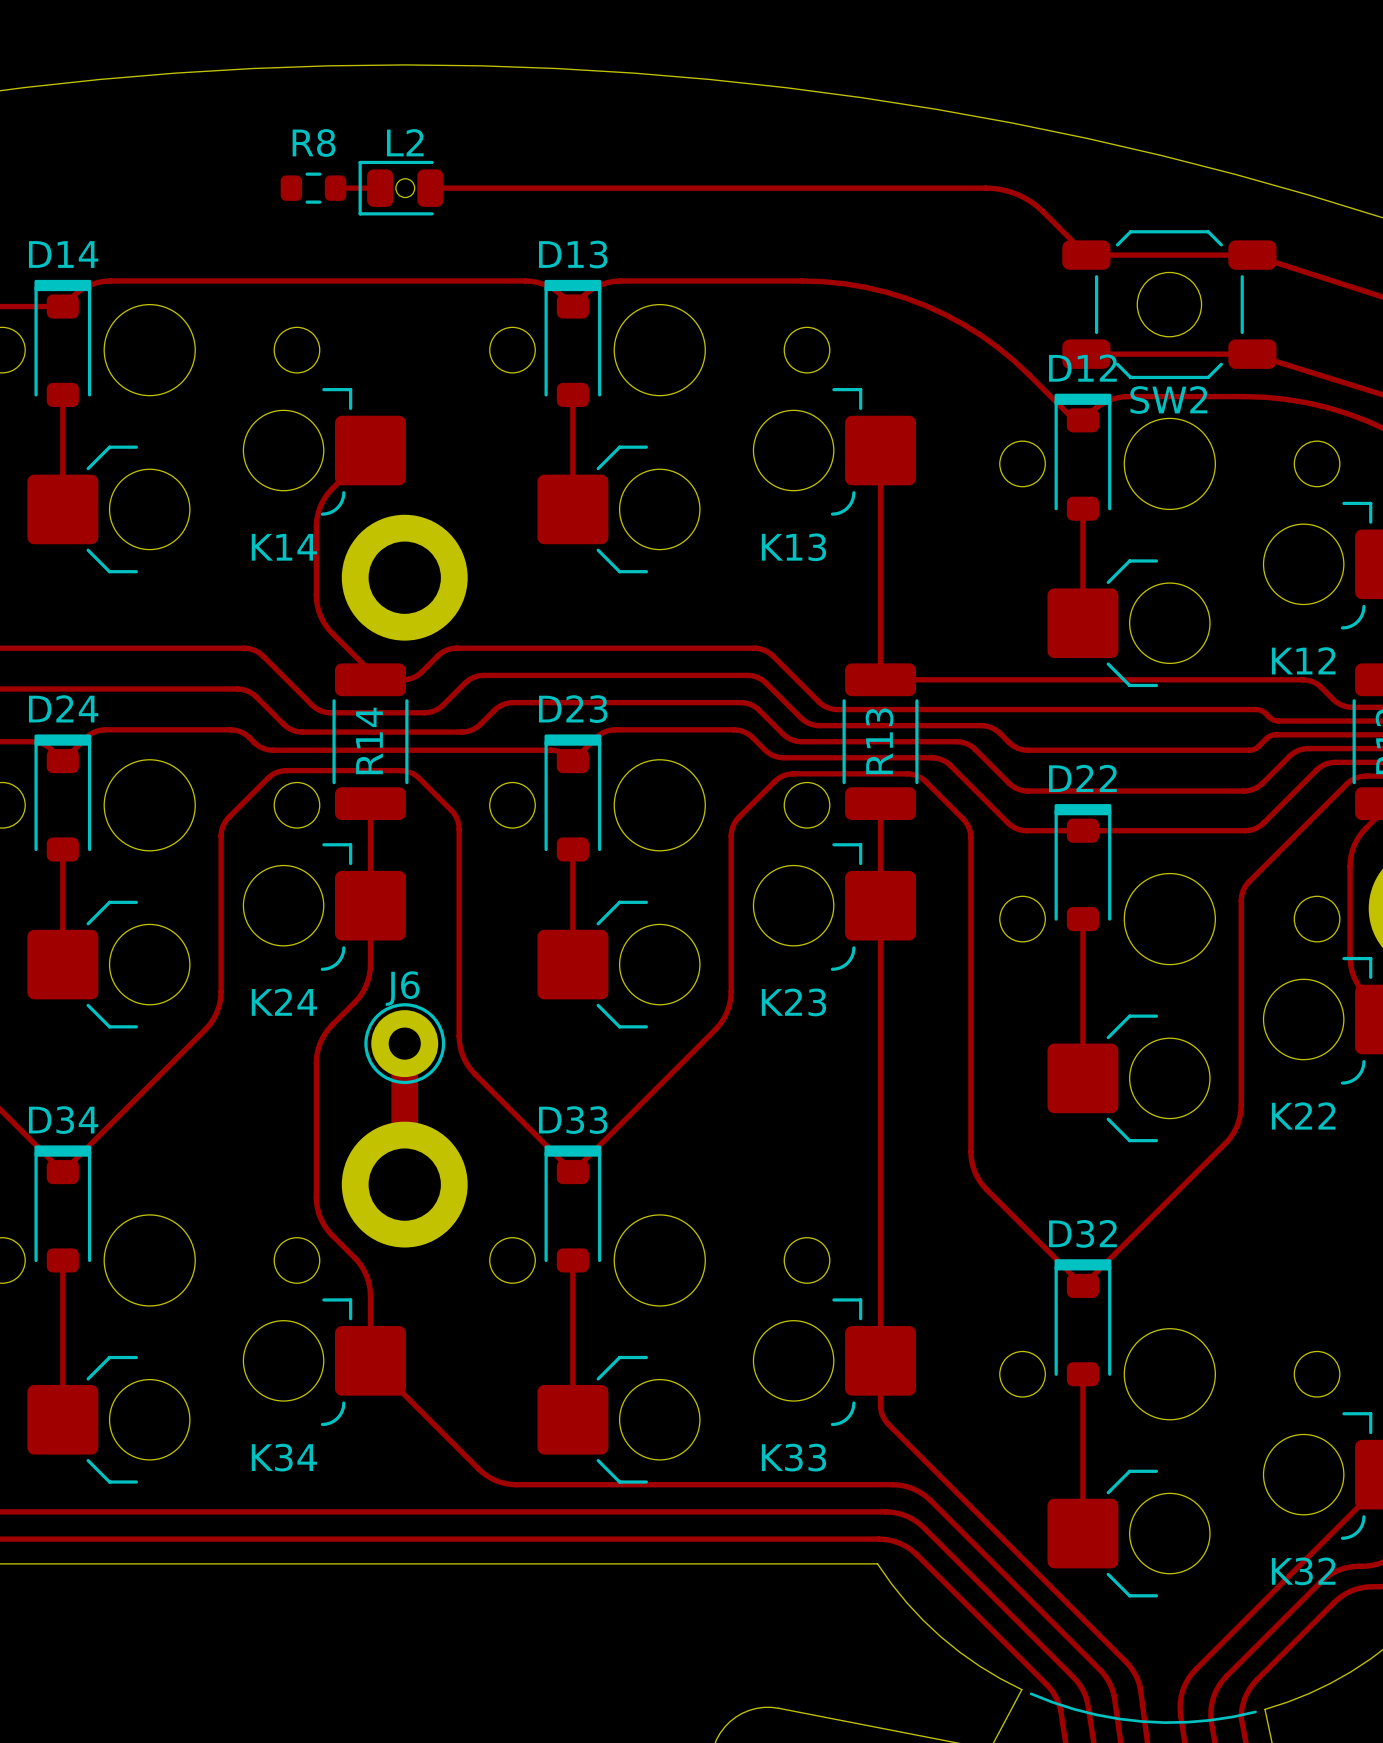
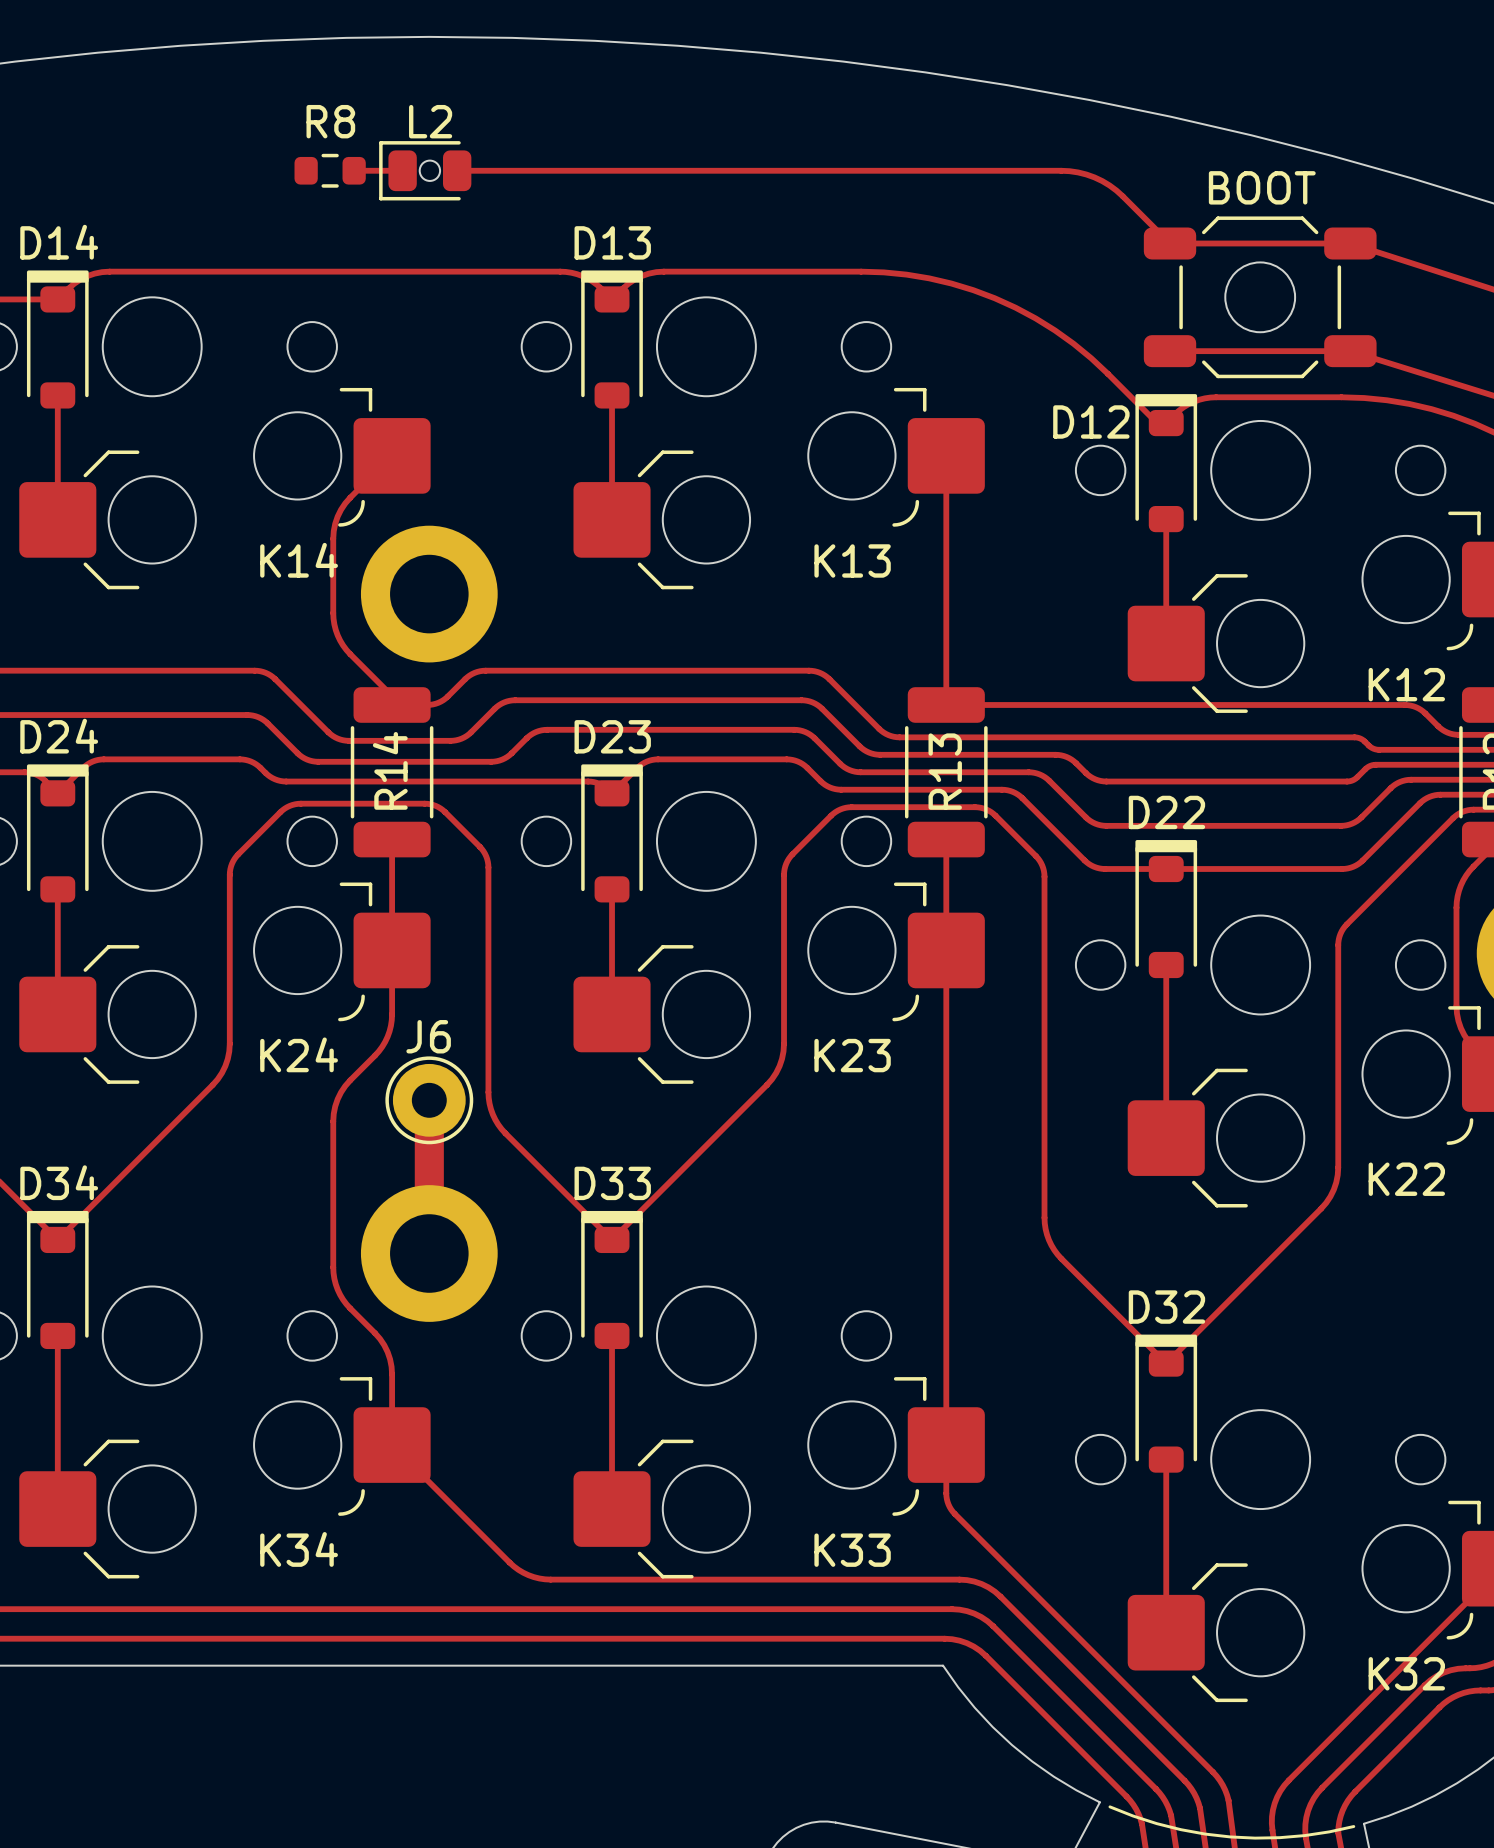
SW2 value: none -> BOOT (1262, 187)
D12 name position: D12 (1082, 368) -> D12 (1091, 421)
SW2 name: SW2 (1168, 400) -> none

